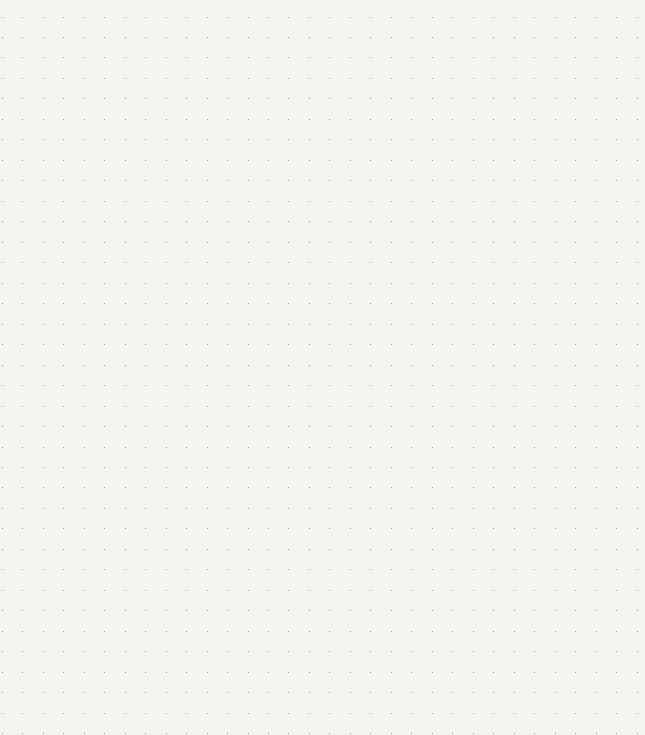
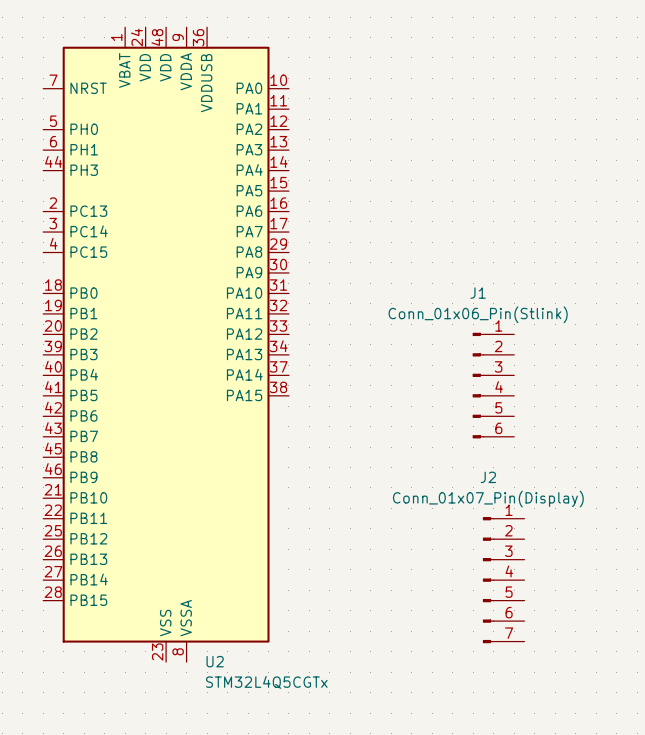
U2: none -> STM32L4Q5CGTx (166, 344)
J1: none -> Conn_01x06_Pin(Stlink) (493, 385)
J2: none -> Conn_01x07_Pin(Display) (503, 580)

